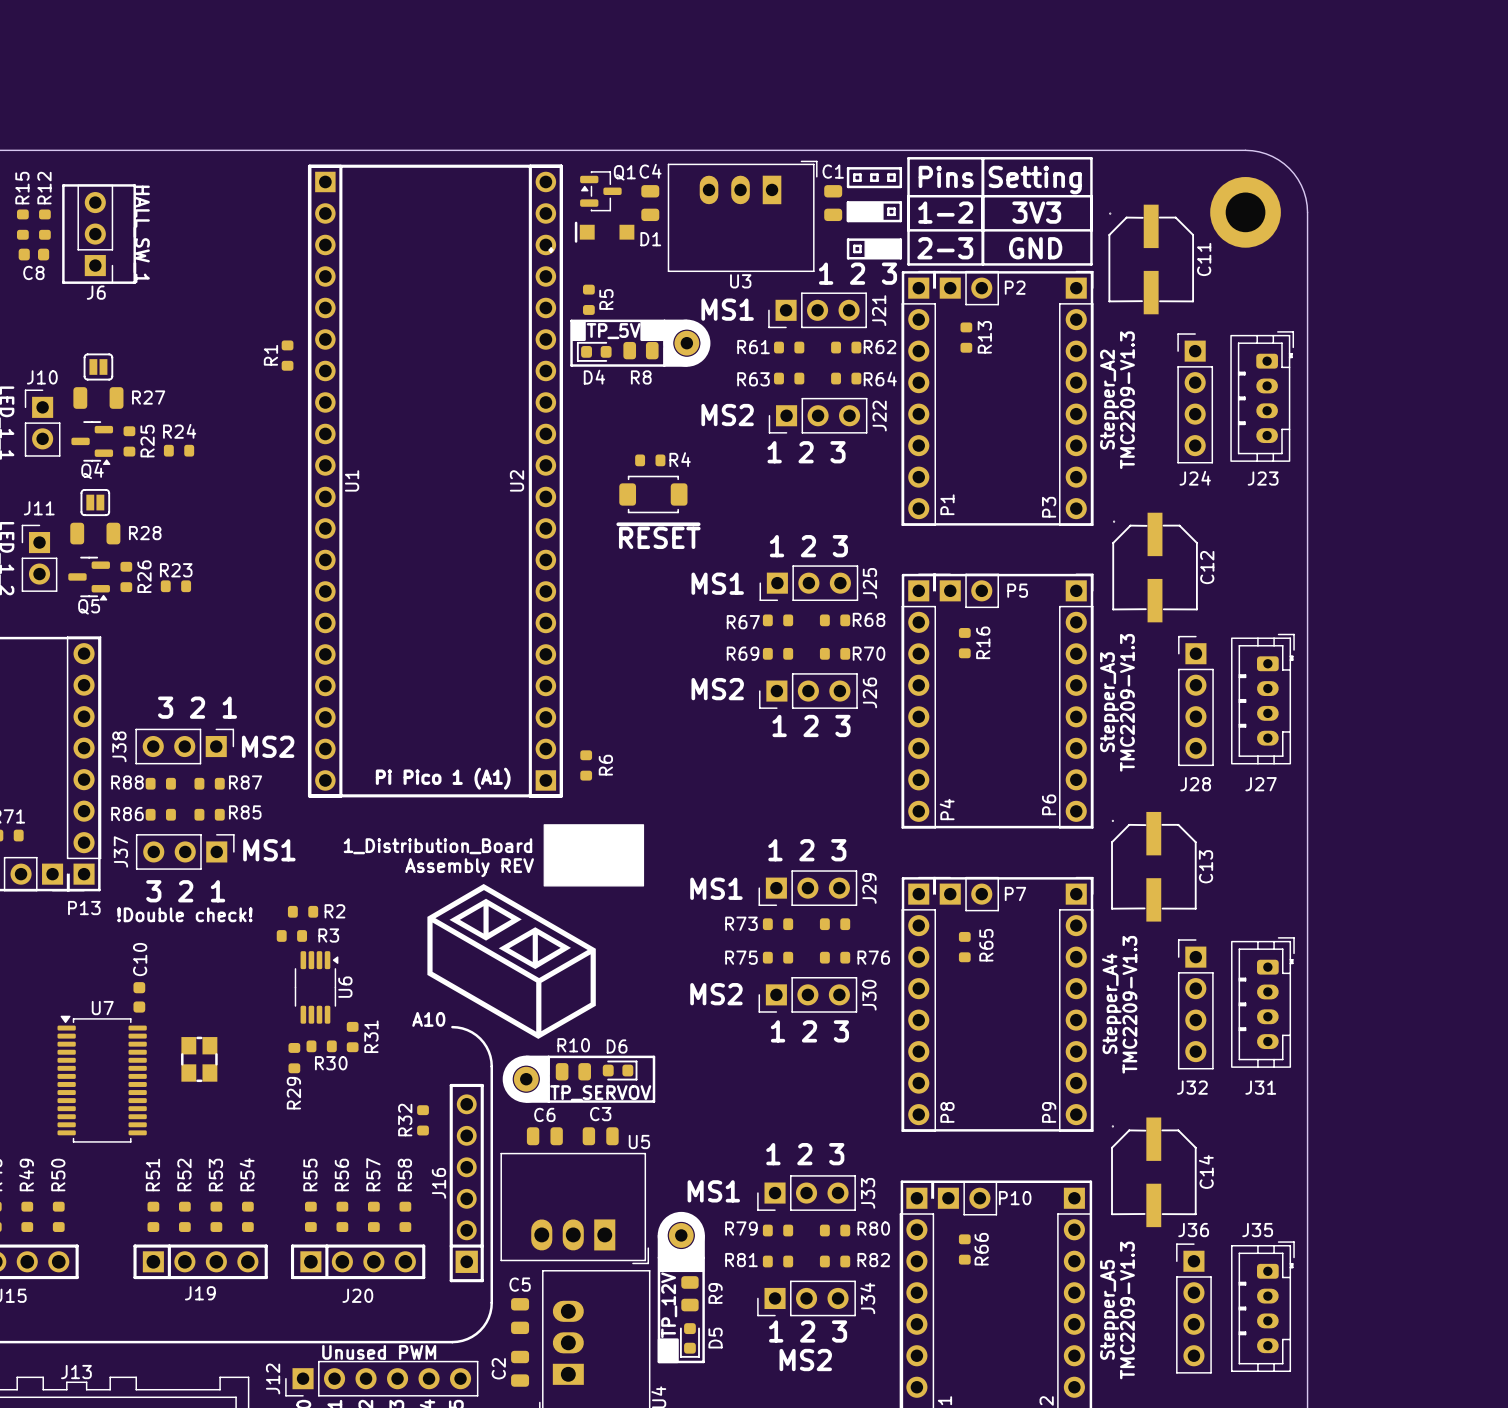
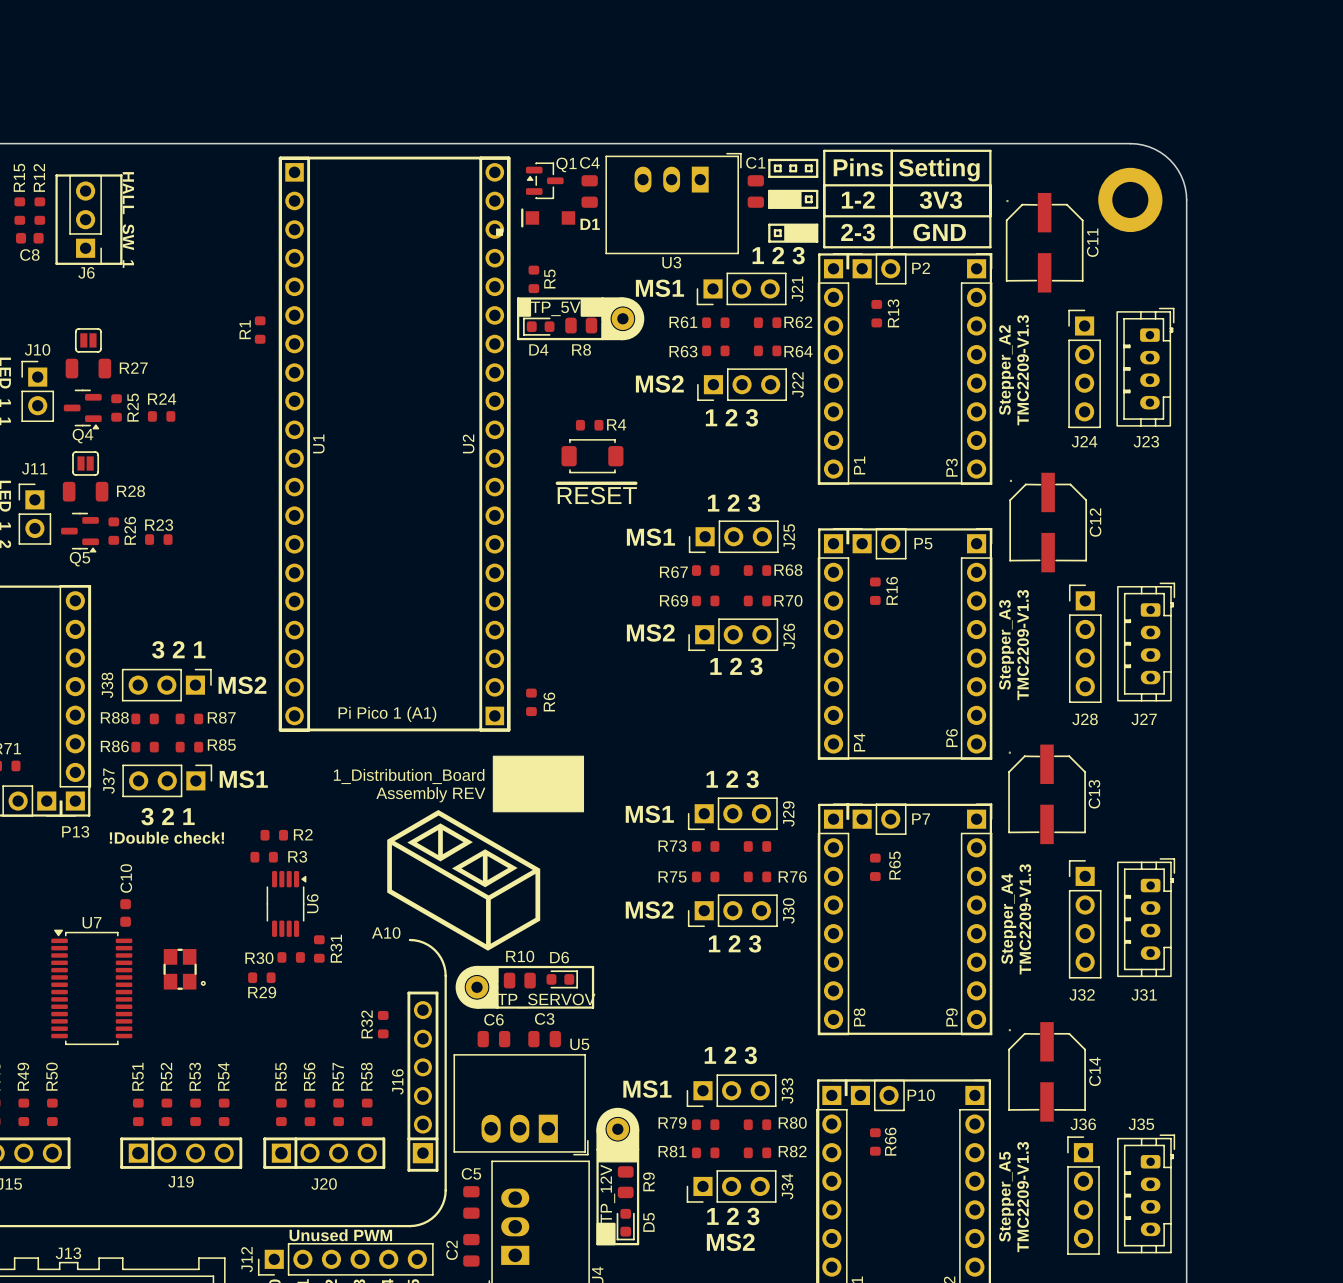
R29 rotation: 0° (294, 1058) -> 90° clockwise (261, 977)
R30 name position: R30 (331, 1063) -> R30 (259, 958)
drawing: none -> [201, 981, 206, 986]

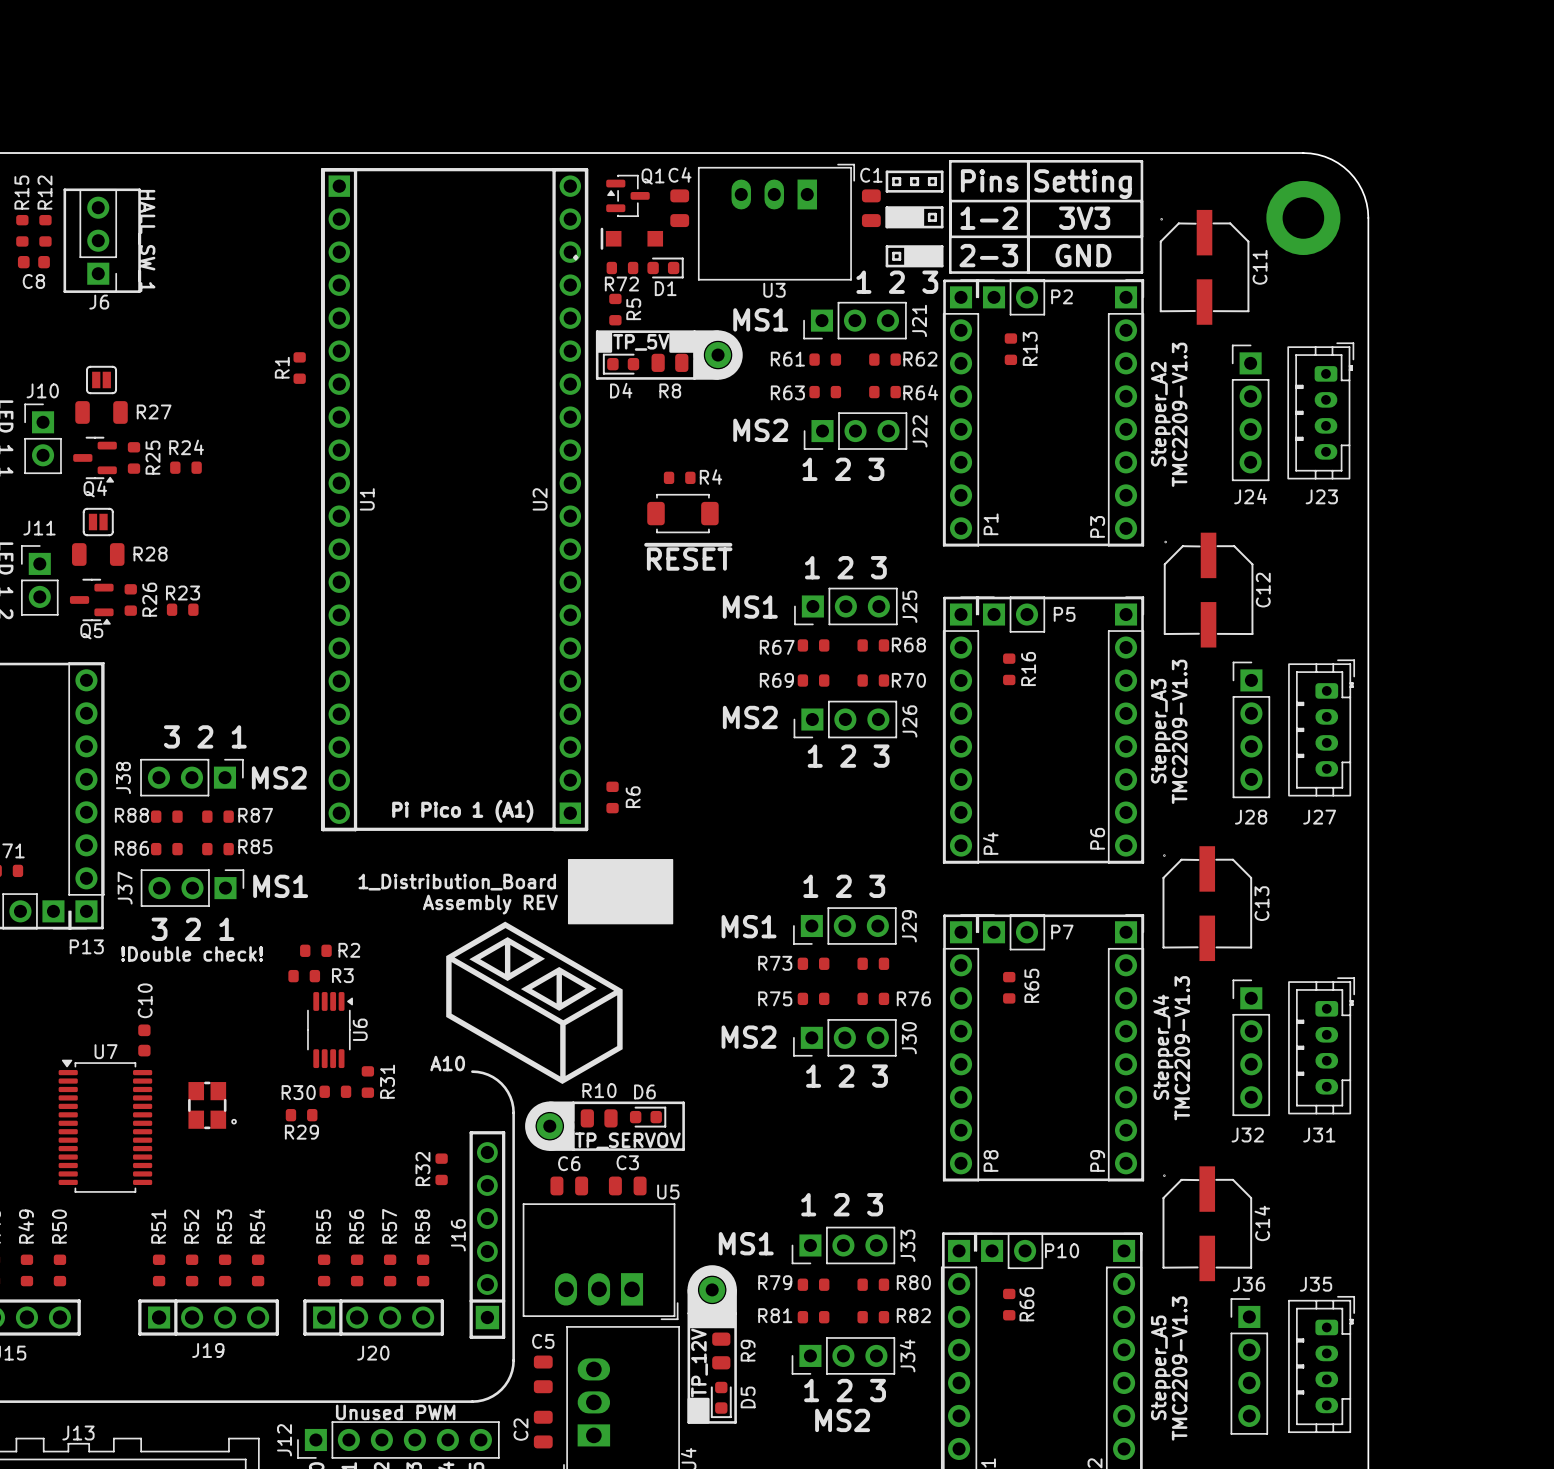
text position: D1 (590, 224) -> D1 (665, 288)
R72: none -> (622, 267)
part: none -> (665, 267)

